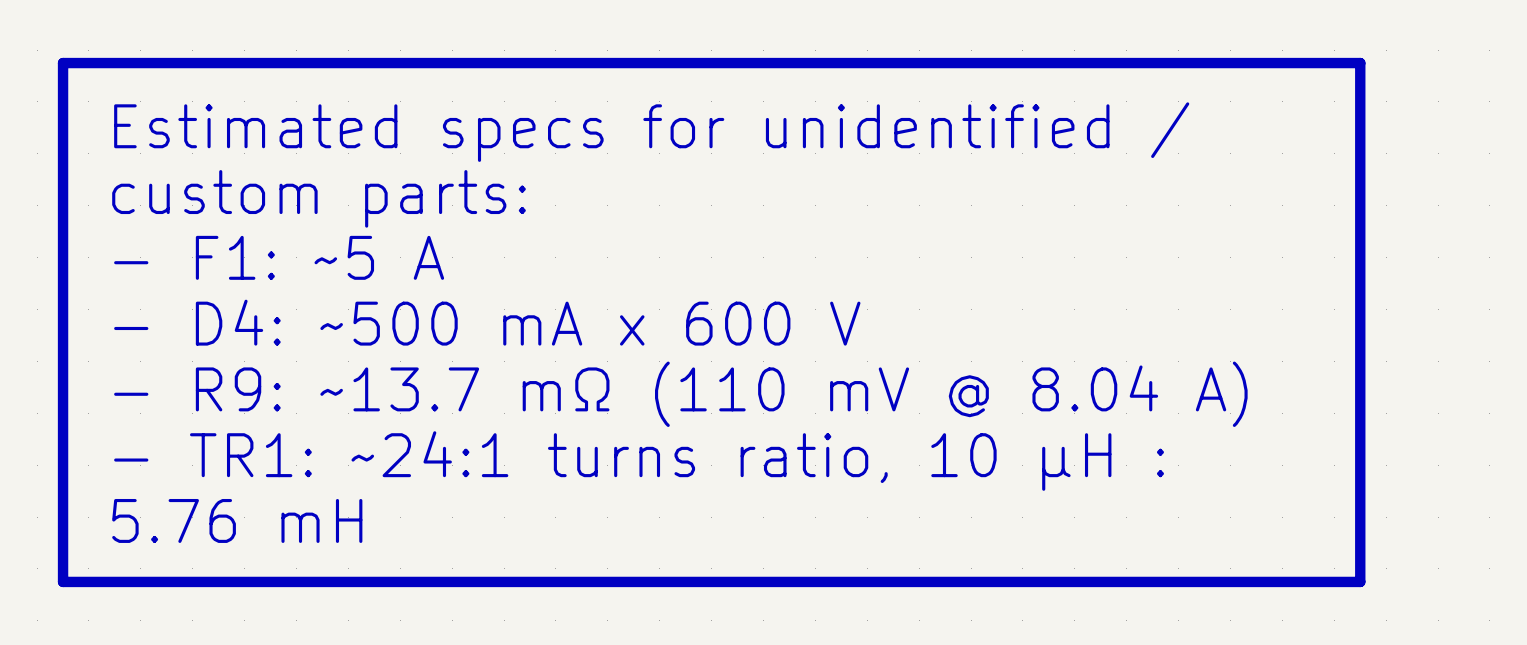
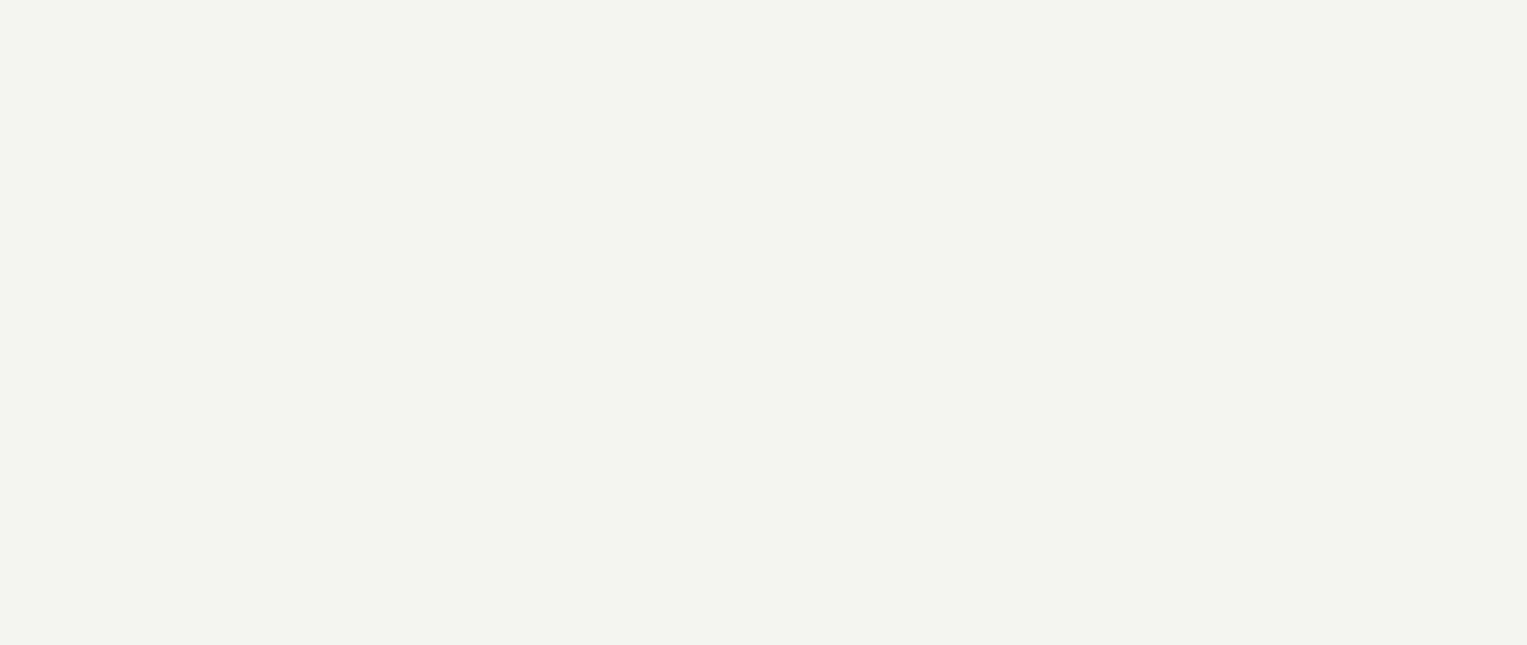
line: (63, 63) (1360, 63) (1360, 581) (63, 581) (63, 63) -> none
text: Estimated specs for unidentified / (651, 132) -> none
text: custom parts: (319, 198) -> none
text: - F1: ~5 A (279, 257) -> none
text: - D4: ~500 mA x 600 V (487, 322) -> none
text: - R9: ~13.7 mΩ (110 mV @ 8.04 A) (680, 394) -> none
text: - TR1: ~24:1 turns ratio, 10 μH : (639, 461) -> none
text: 5.76 mH (237, 520) -> none

